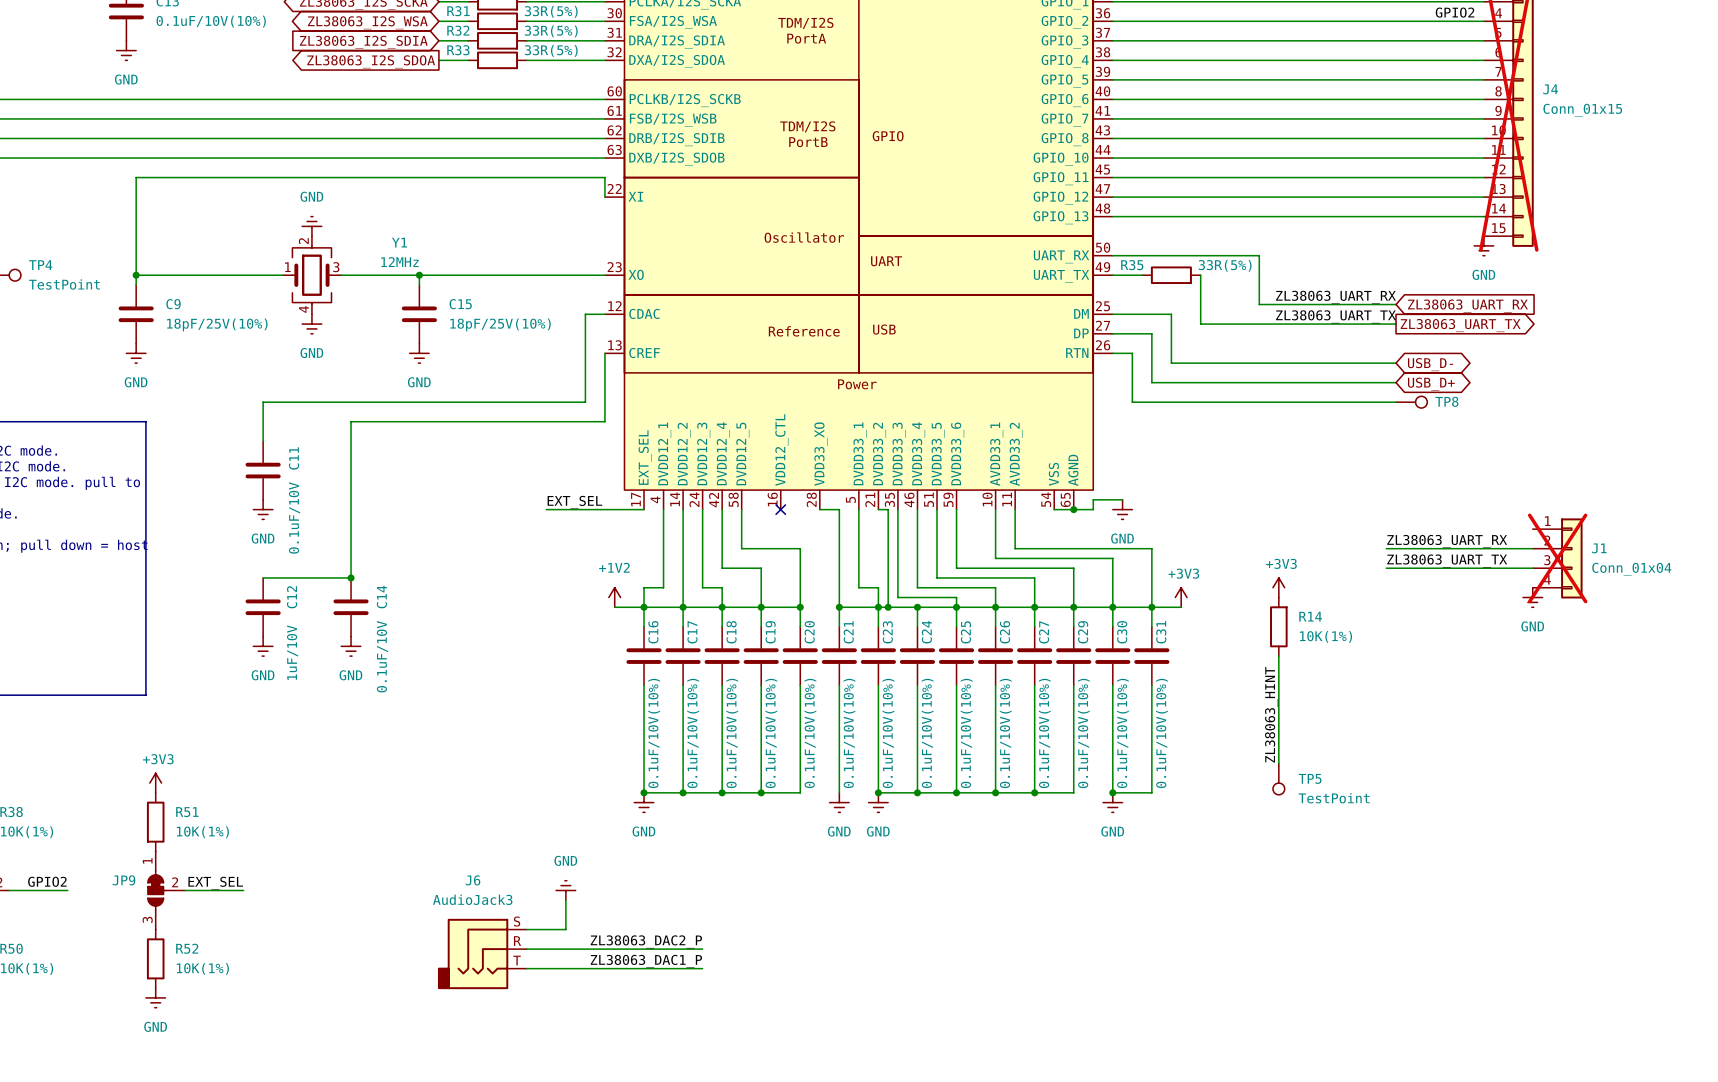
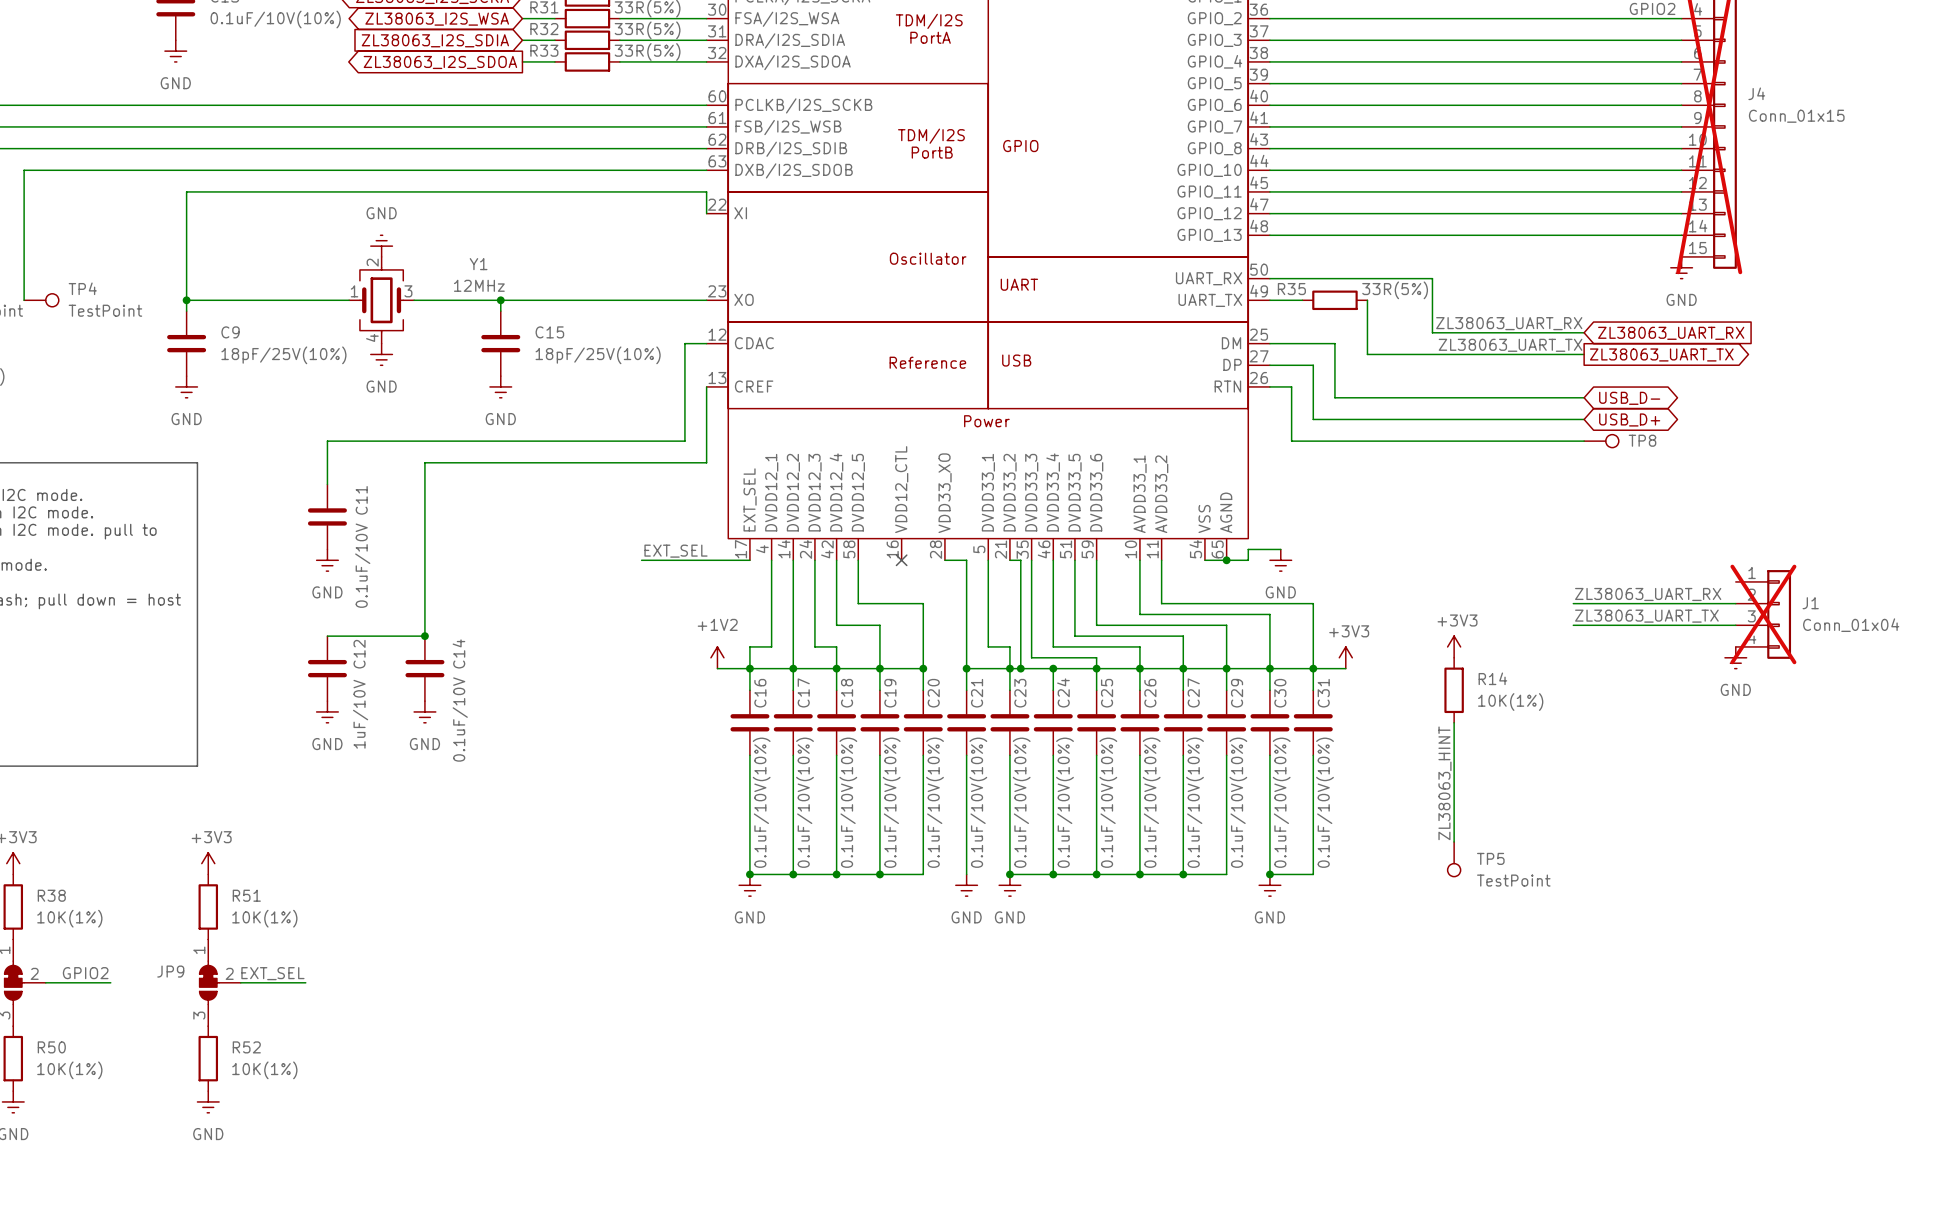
power symbol: GND (565, 890) -> none
wire: (565, 900) (565, 929) (526, 929) -> none
label: ZL38063_DAC2_P (646, 941) -> none
wire: (526, 949) (702, 949) -> none
J6: AudioJack3 (482, 953) -> none
label: ZL38063_DAC1_P (646, 961) -> none
wire: (526, 968) (702, 968) -> none

